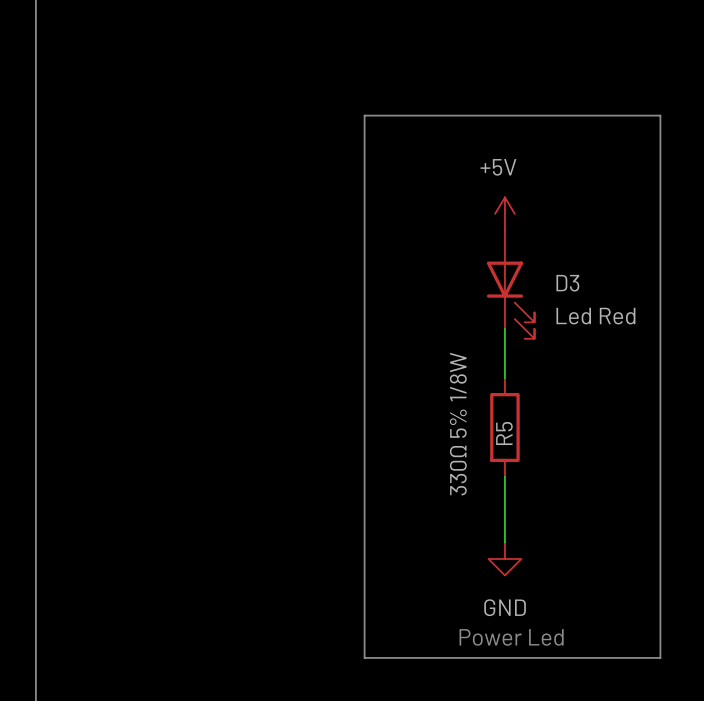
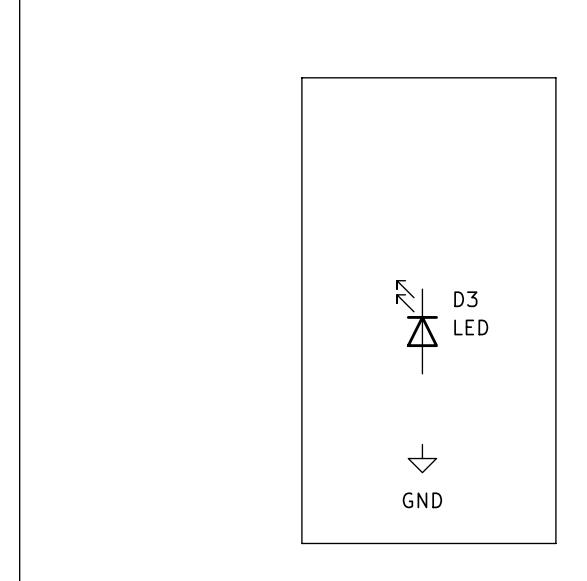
power symbol: +5V (504, 213) -> none
D3 name position: D3 (567, 283) -> D3 (465, 299)
D3 position: (510, 284) -> (417, 327)
D3 rotation: 0° (510, 300) -> 180° (417, 313)
D3 value: Led Red (595, 316) -> LED (471, 327)
wire: (504, 328) (504, 378) -> none
R5: 330Ω 5% 1/8W (504, 427) -> none
wire: (504, 476) (504, 542) -> none
text: Power Led (511, 637) -> none

